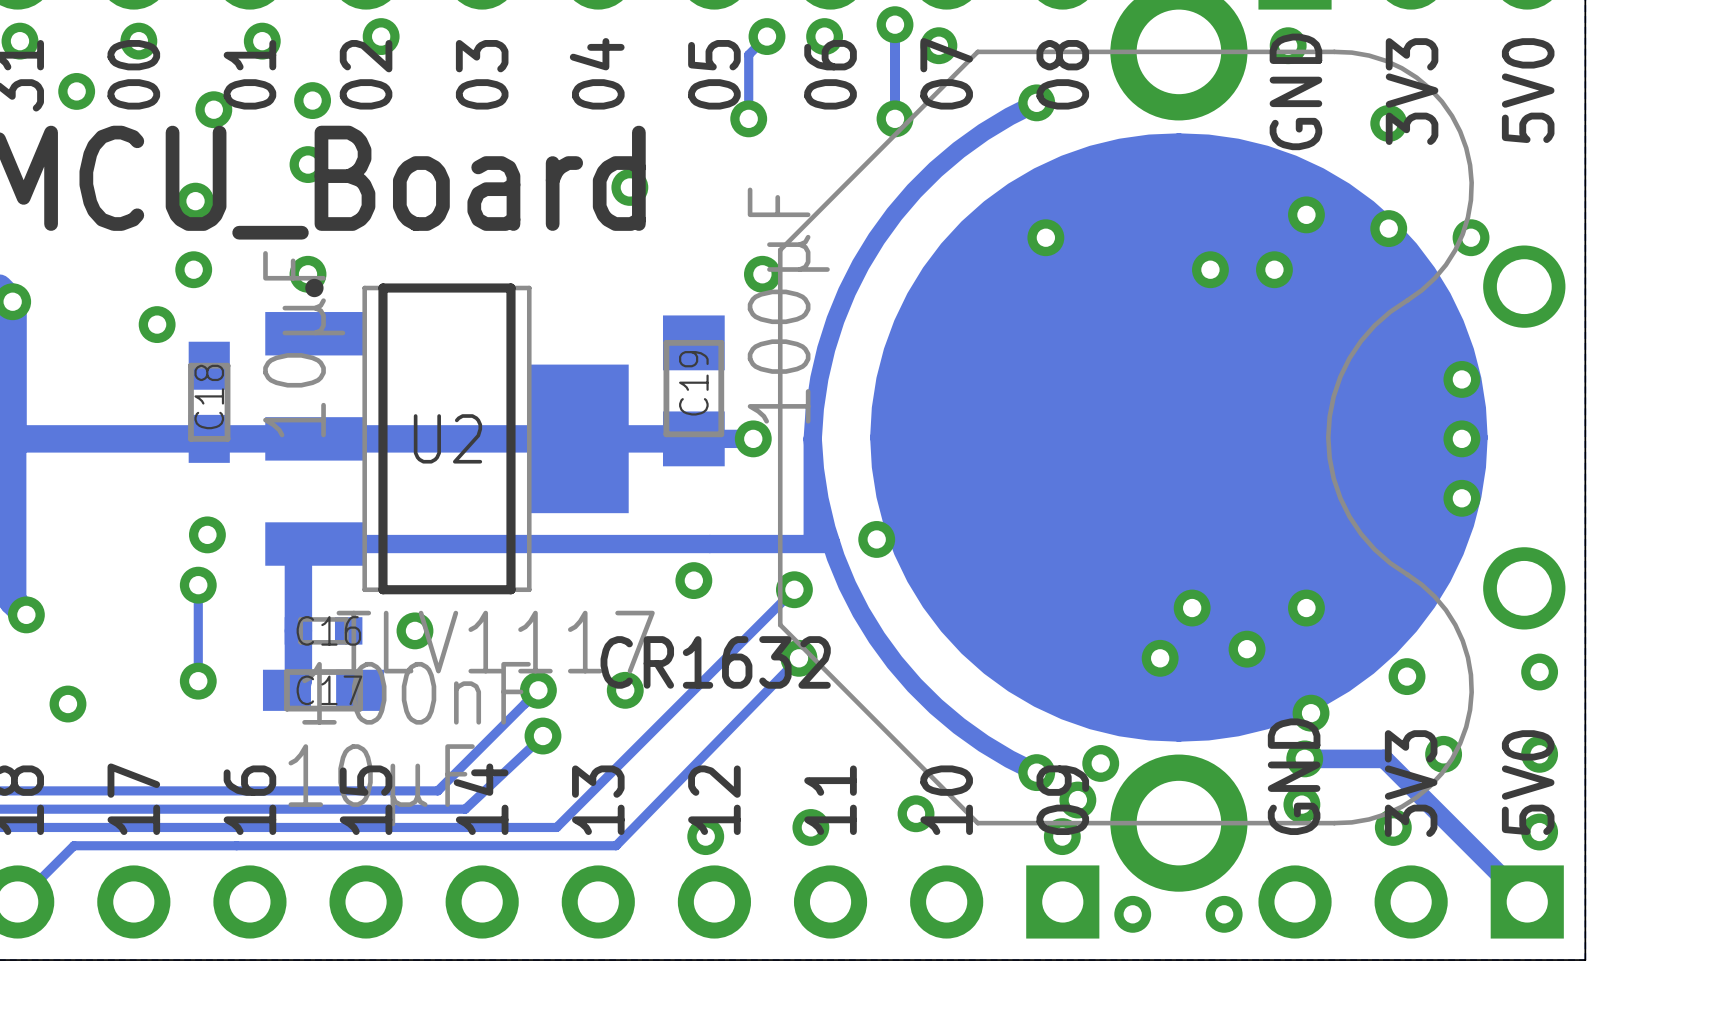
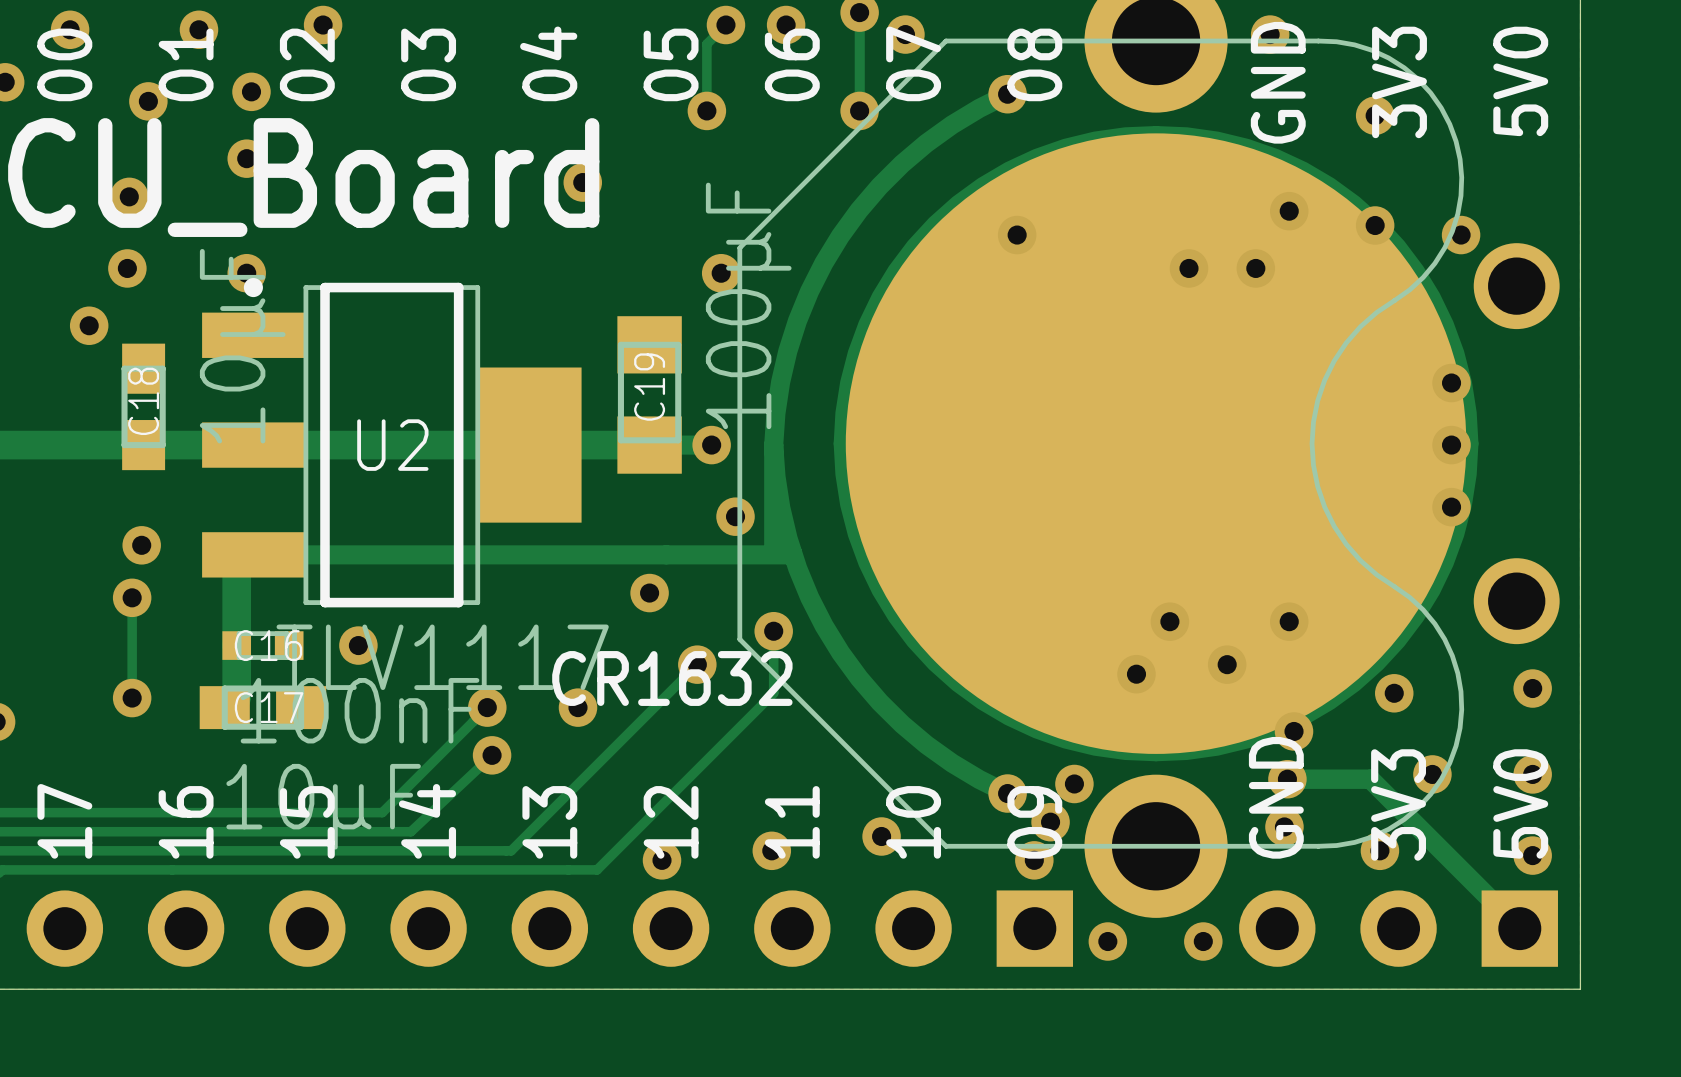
via: none -> (735, 516)
via: (876, 539) -> none
track: (794, 589) (556, 827) -> (697, 664) (511, 850) (506, 850)
via position: (794, 589) -> (773, 631)
via: none -> (697, 664)
track: (799, 658) (616, 845) -> (773, 631) (773, 693) (597, 869) (568, 869)
via: (799, 658) -> none

